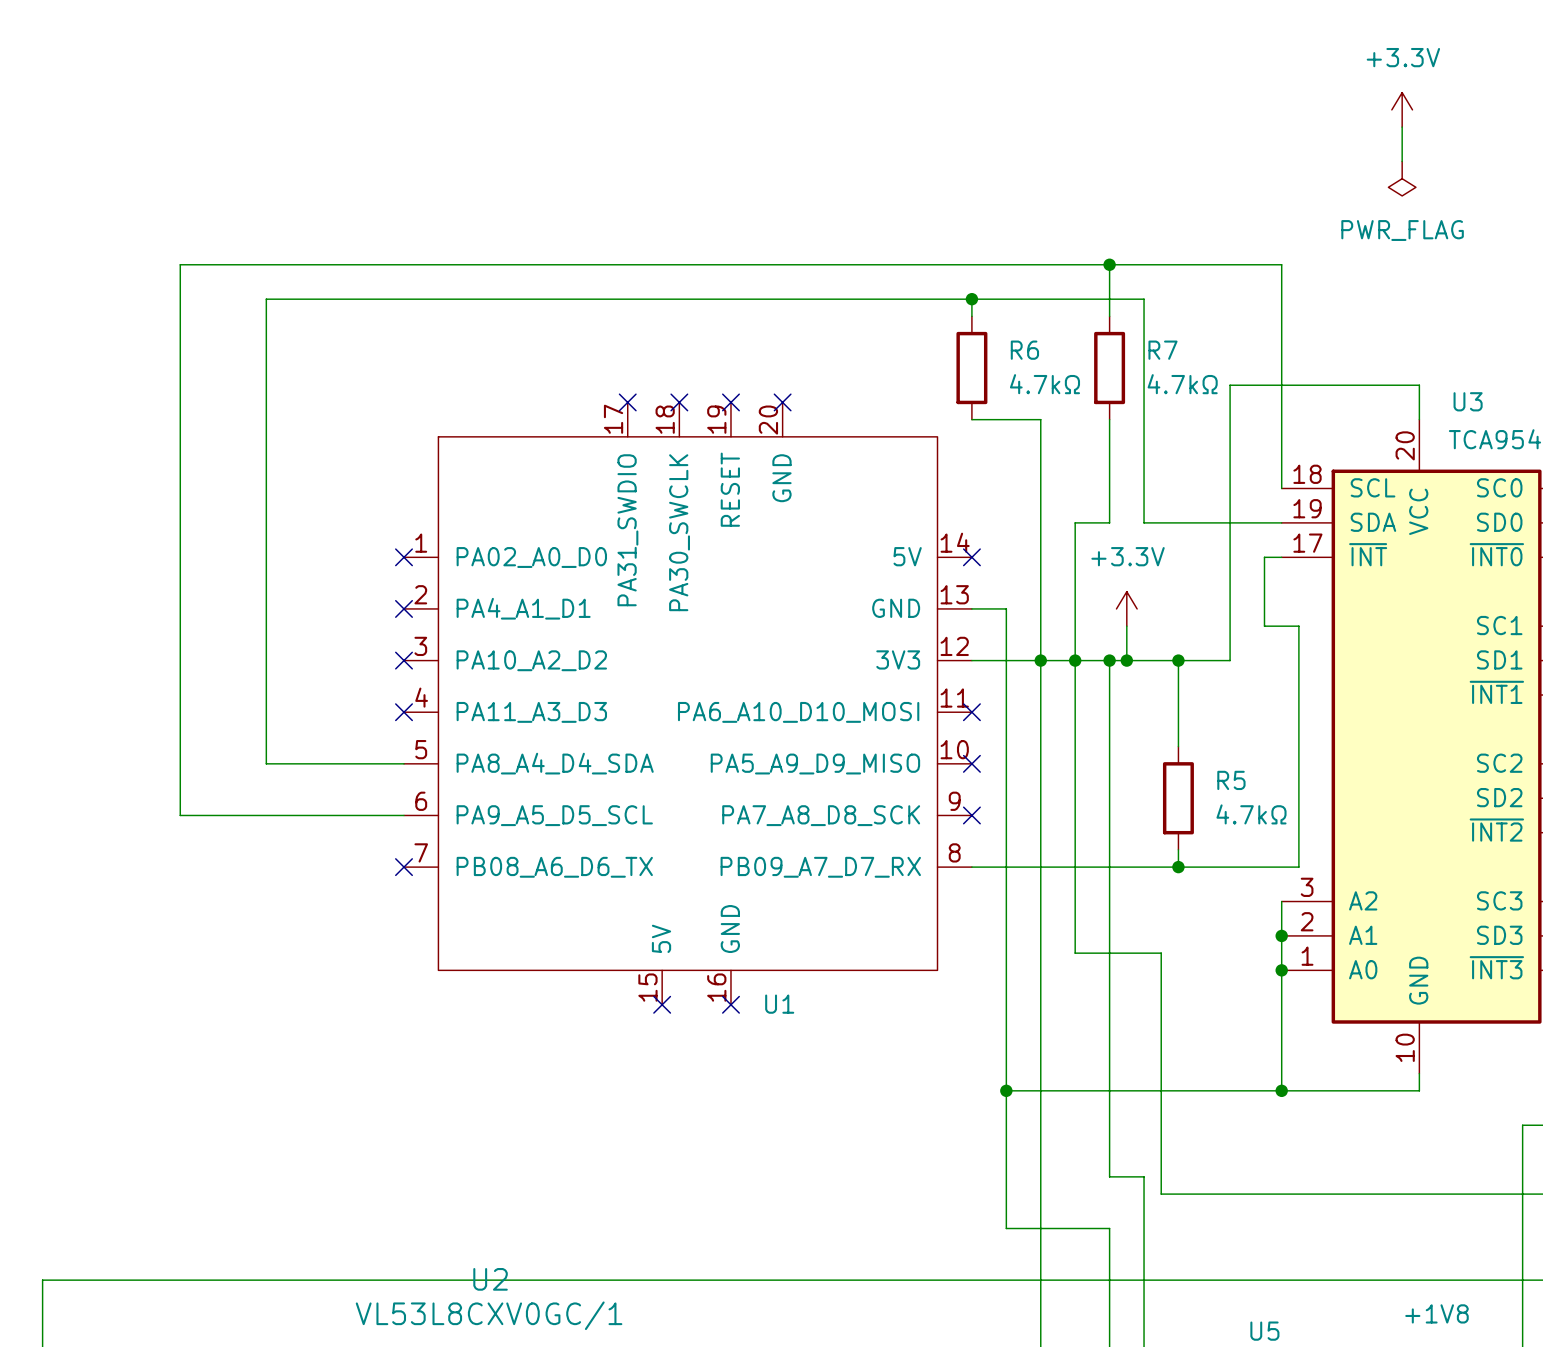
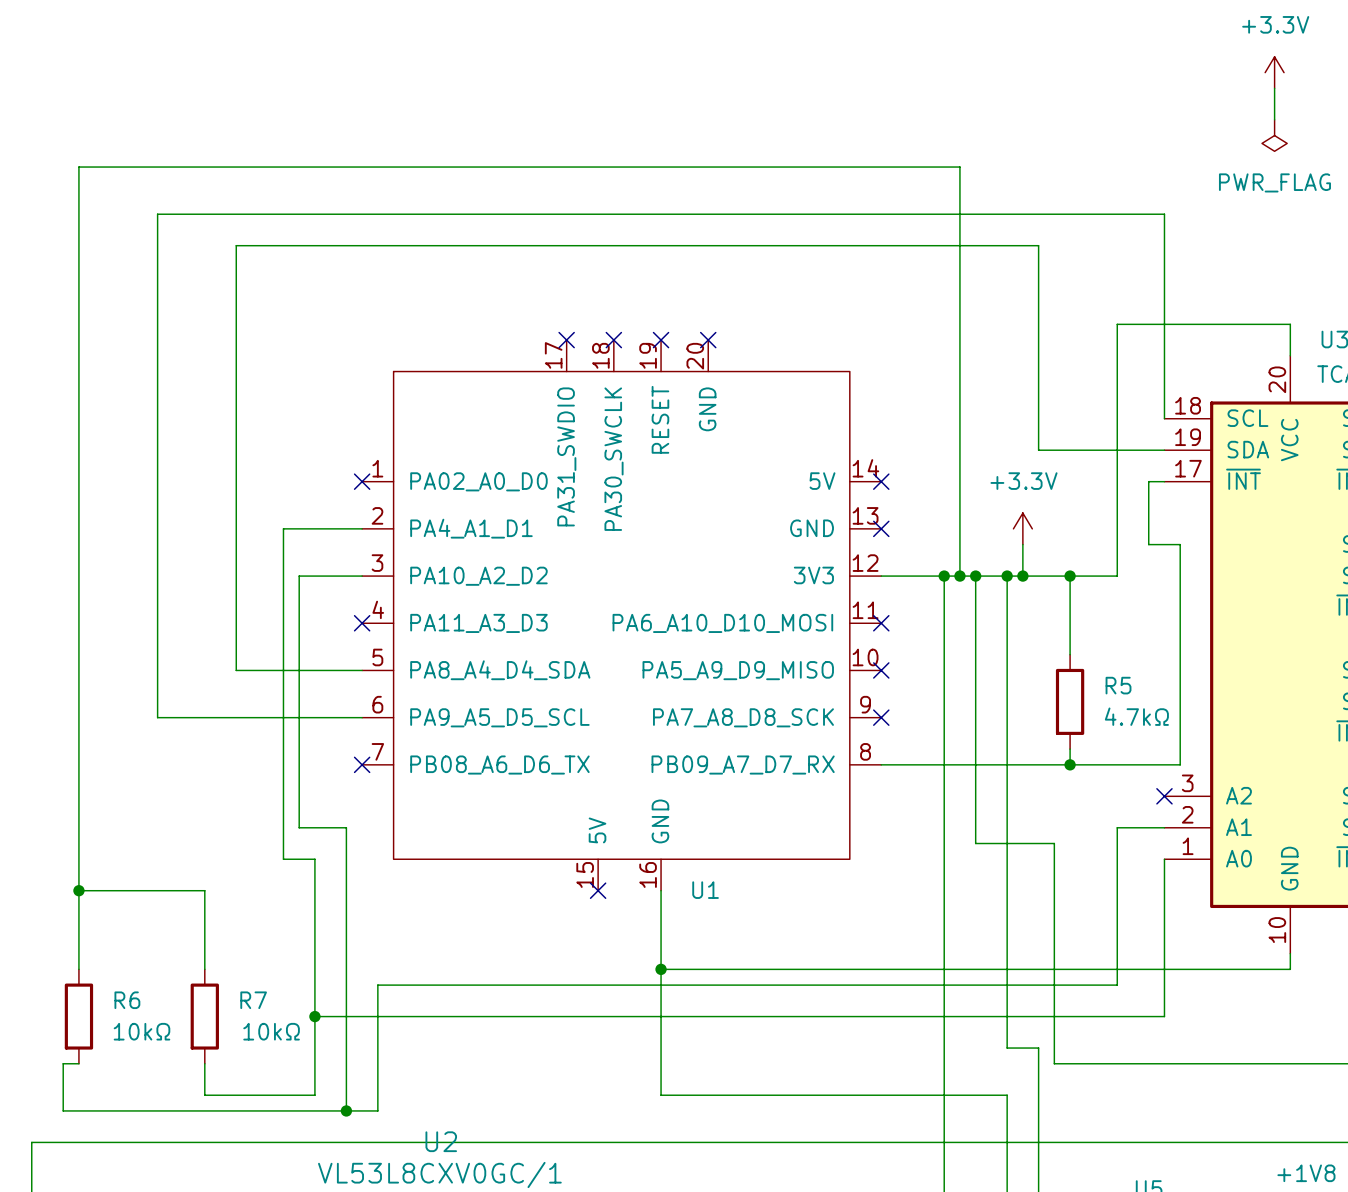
wire: (1109, 264) (1109, 316) -> none
junction: (1109, 264) -> none
wire: (971, 299) (971, 316) -> none
junction: (971, 299) -> none
R6 position: (971, 368) -> (78, 1016)
R7 position: (1109, 368) -> (204, 1016)
R6 value: 4.7kΩ (1044, 384) -> 10kΩ (141, 1031)
R7 value: 4.7kΩ (1182, 384) -> 10kΩ (271, 1031)
wire: (971, 419) (1040, 419) (1040, 660) -> none
wire: (1109, 419) (1109, 522) (1075, 522) (1075, 660) -> none
wire: none -> (362, 528) (283, 528) (283, 859) (314, 859) (314, 1095) (204, 1095) (204, 1063)
no-connect mark: (404, 608) -> none
wire: (971, 608) (1006, 608) (1006, 1228) -> (661, 890) (661, 1095) (912, 1095)
no-connect mark: none -> (881, 528)
wire: none -> (362, 576) (299, 576) (299, 827) (346, 827) (346, 1110)
no-connect mark: (404, 660) -> none
wire: none -> (959, 576) (959, 167) (78, 167) (78, 969)
junction: none -> (959, 576)
wire: (1281, 901) (1281, 970) -> none
no-connect mark: none -> (1164, 796)
wire: none -> (1164, 827) (1117, 827) (1117, 985) (377, 985) (377, 1110) (63, 1110) (63, 1063) (78, 1063)
junction: (1281, 935) -> none
junction: (1281, 970) -> none
wire: none -> (78, 890) (204, 890) (204, 969)
junction: none -> (78, 890)
no-connect mark: (730, 1004) -> none
wire: none -> (661, 969) (912, 969)
junction: none -> (661, 969)
junction: (1006, 1090) -> none
wire: none -> (1164, 969) (1164, 1016) (314, 1016)
junction: (1281, 1090) -> none
junction: none -> (314, 1016)
junction: none -> (346, 1110)

